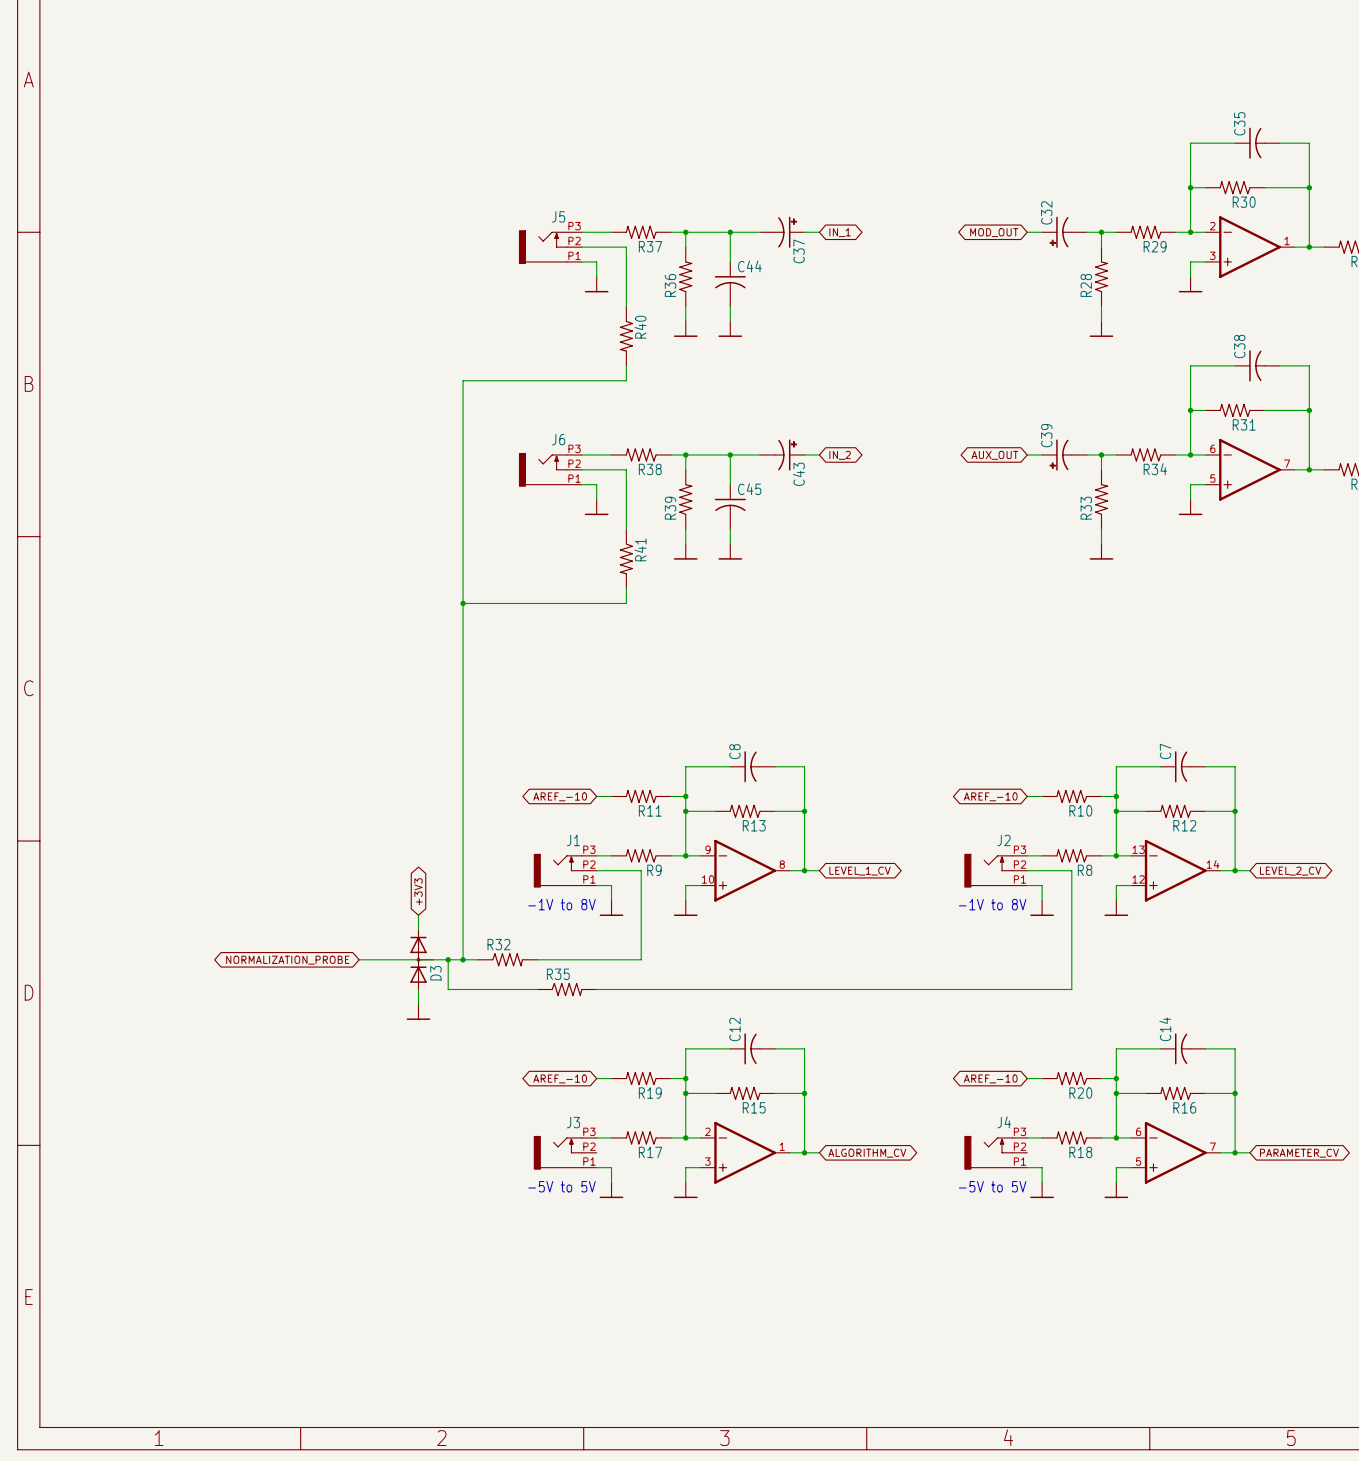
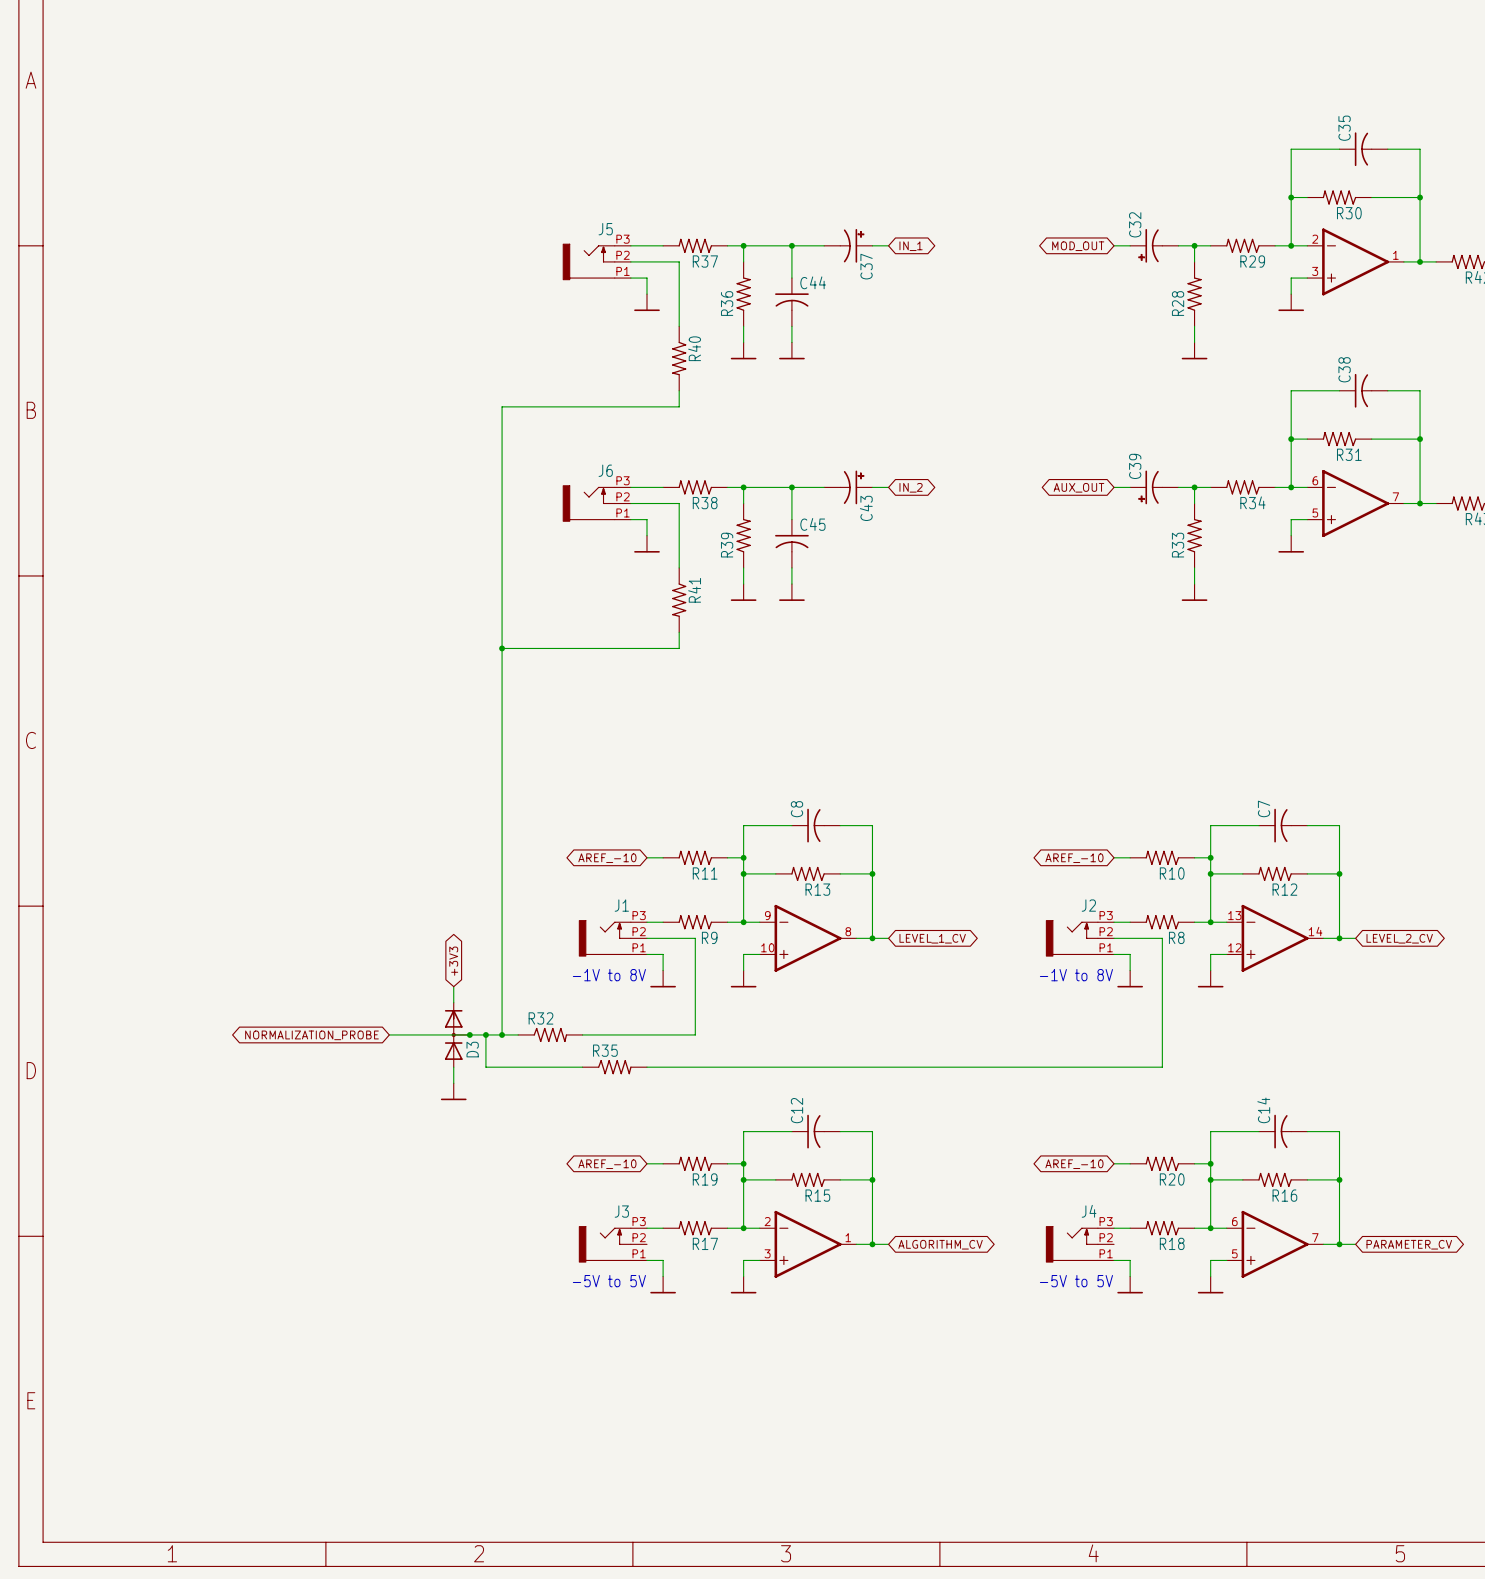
junction: none -> (469, 1034)

